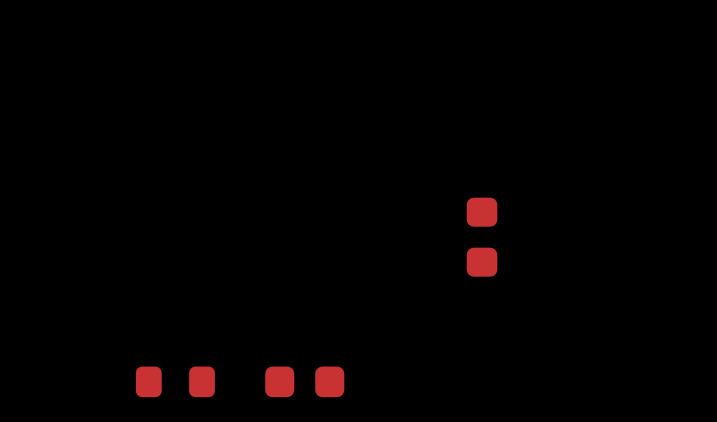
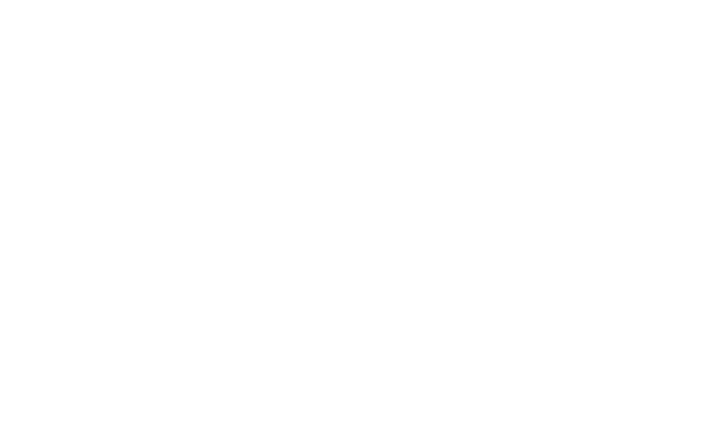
part: (482, 237) -> none
part: (175, 381) -> none
part: (304, 381) -> none

